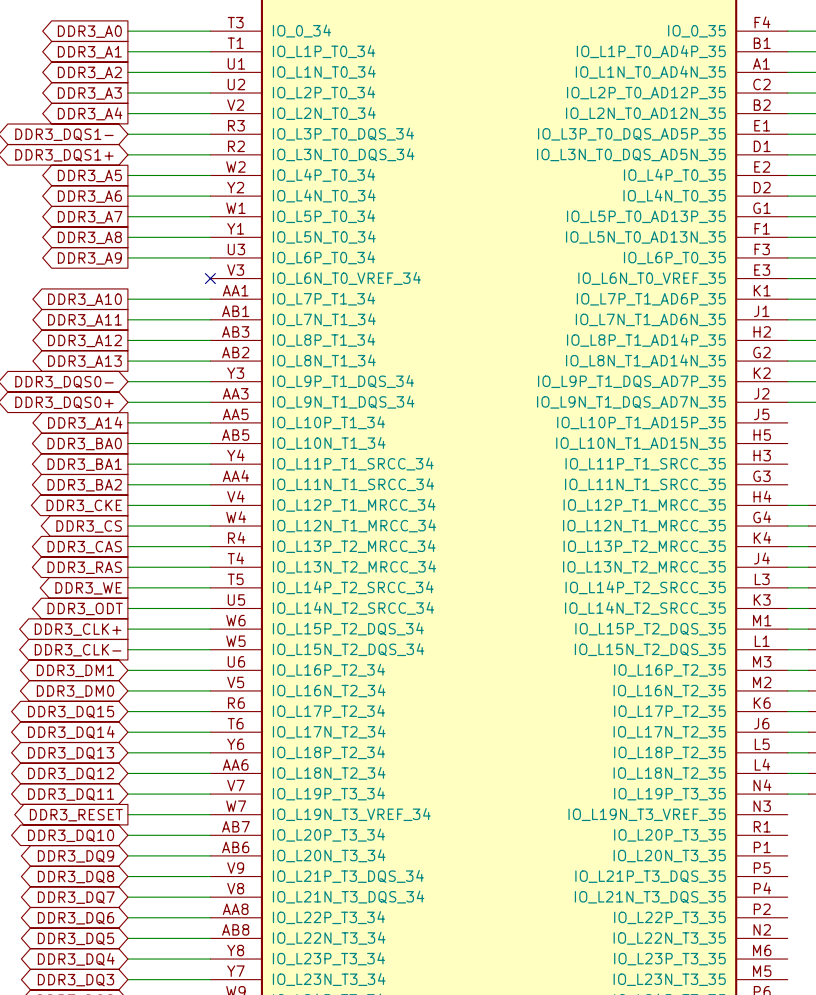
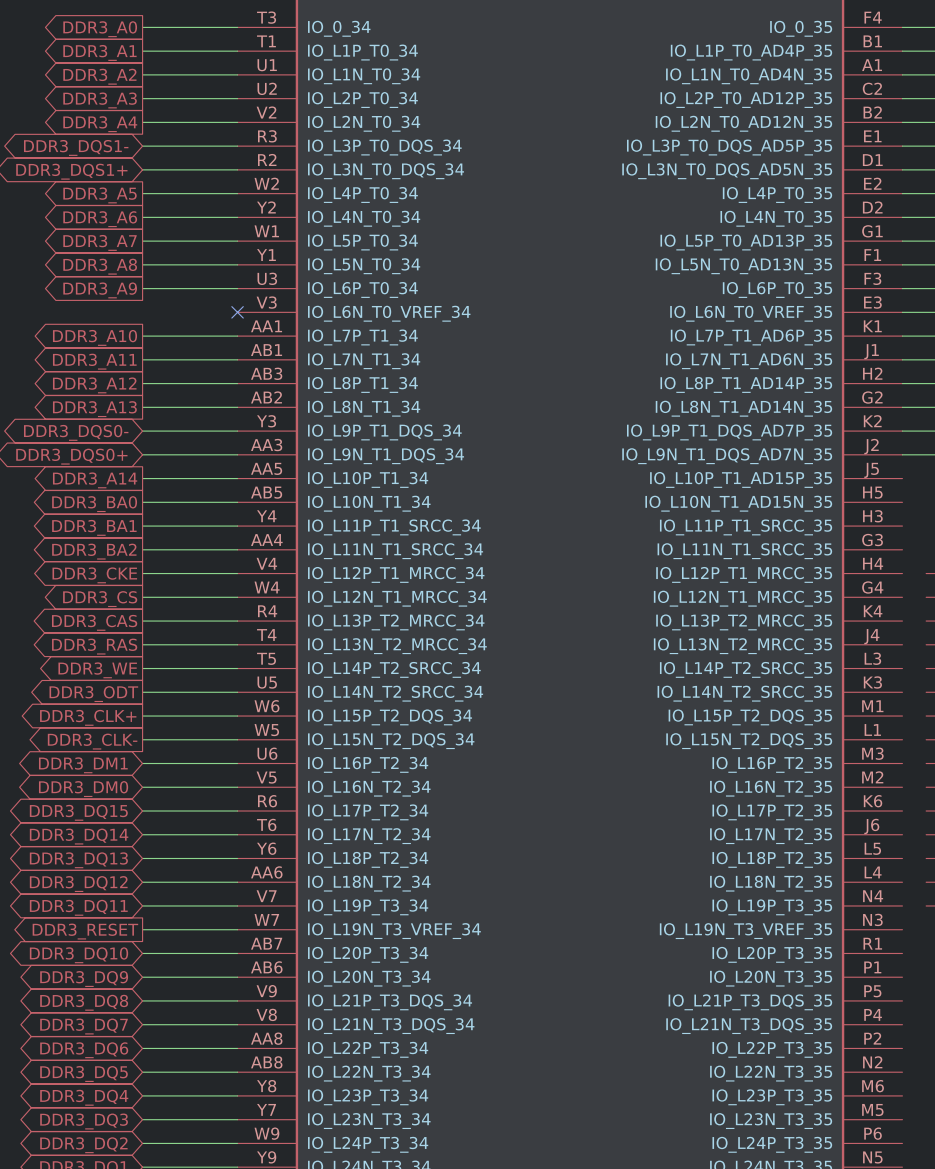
wire: (787, 505) (808, 505) -> none
wire: (787, 526) (808, 526) -> none
wire: (787, 546) (808, 546) -> none
wire: (787, 567) (808, 567) -> none
wire: (787, 587) (808, 587) -> none
wire: (787, 608) (808, 608) -> none
wire: (787, 629) (808, 629) -> none
wire: (787, 649) (808, 649) -> none
wire: (787, 670) (808, 670) -> none
wire: (787, 690) (808, 690) -> none
wire: (787, 711) (808, 711) -> none
wire: (787, 732) (808, 732) -> none
wire: (787, 752) (808, 752) -> none
wire: (787, 773) (808, 773) -> none
wire: (787, 794) (808, 794) -> none

